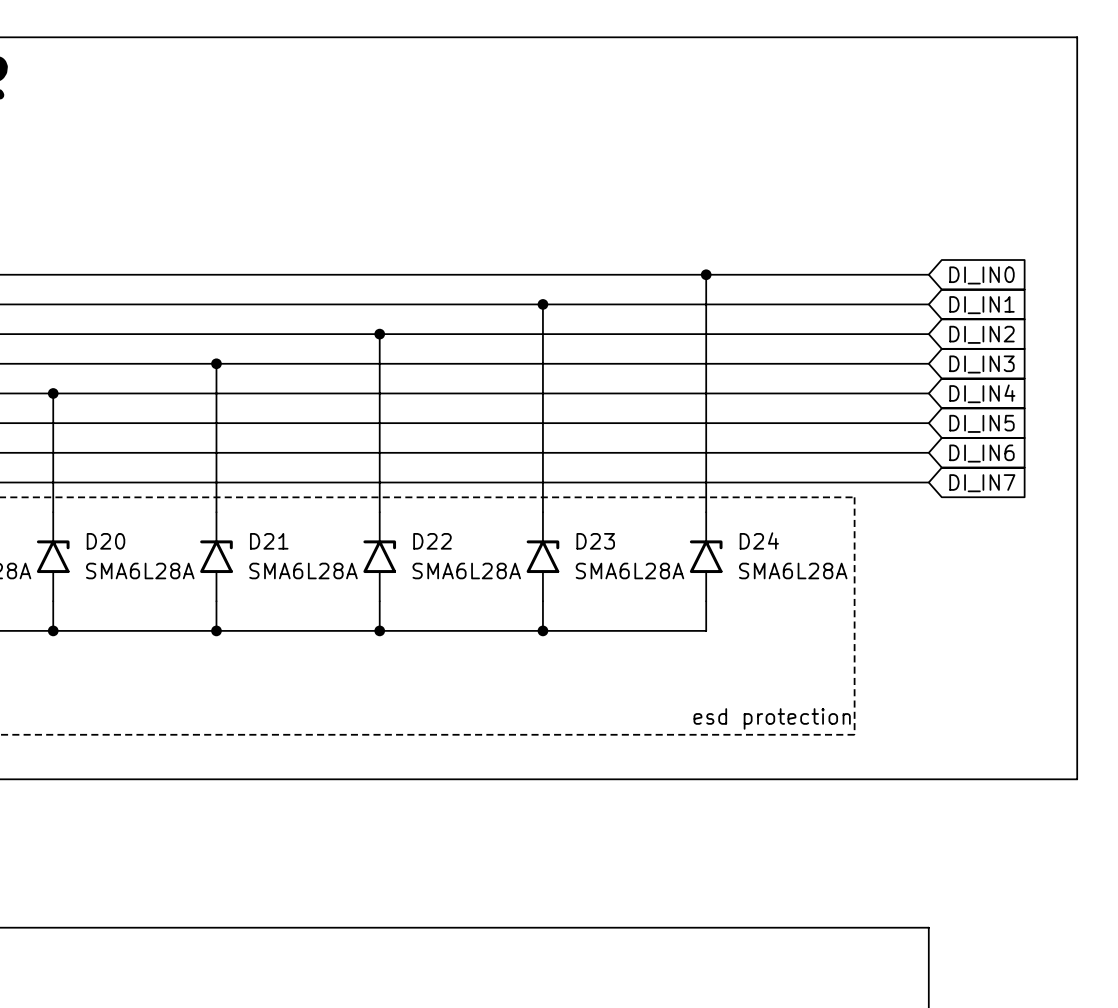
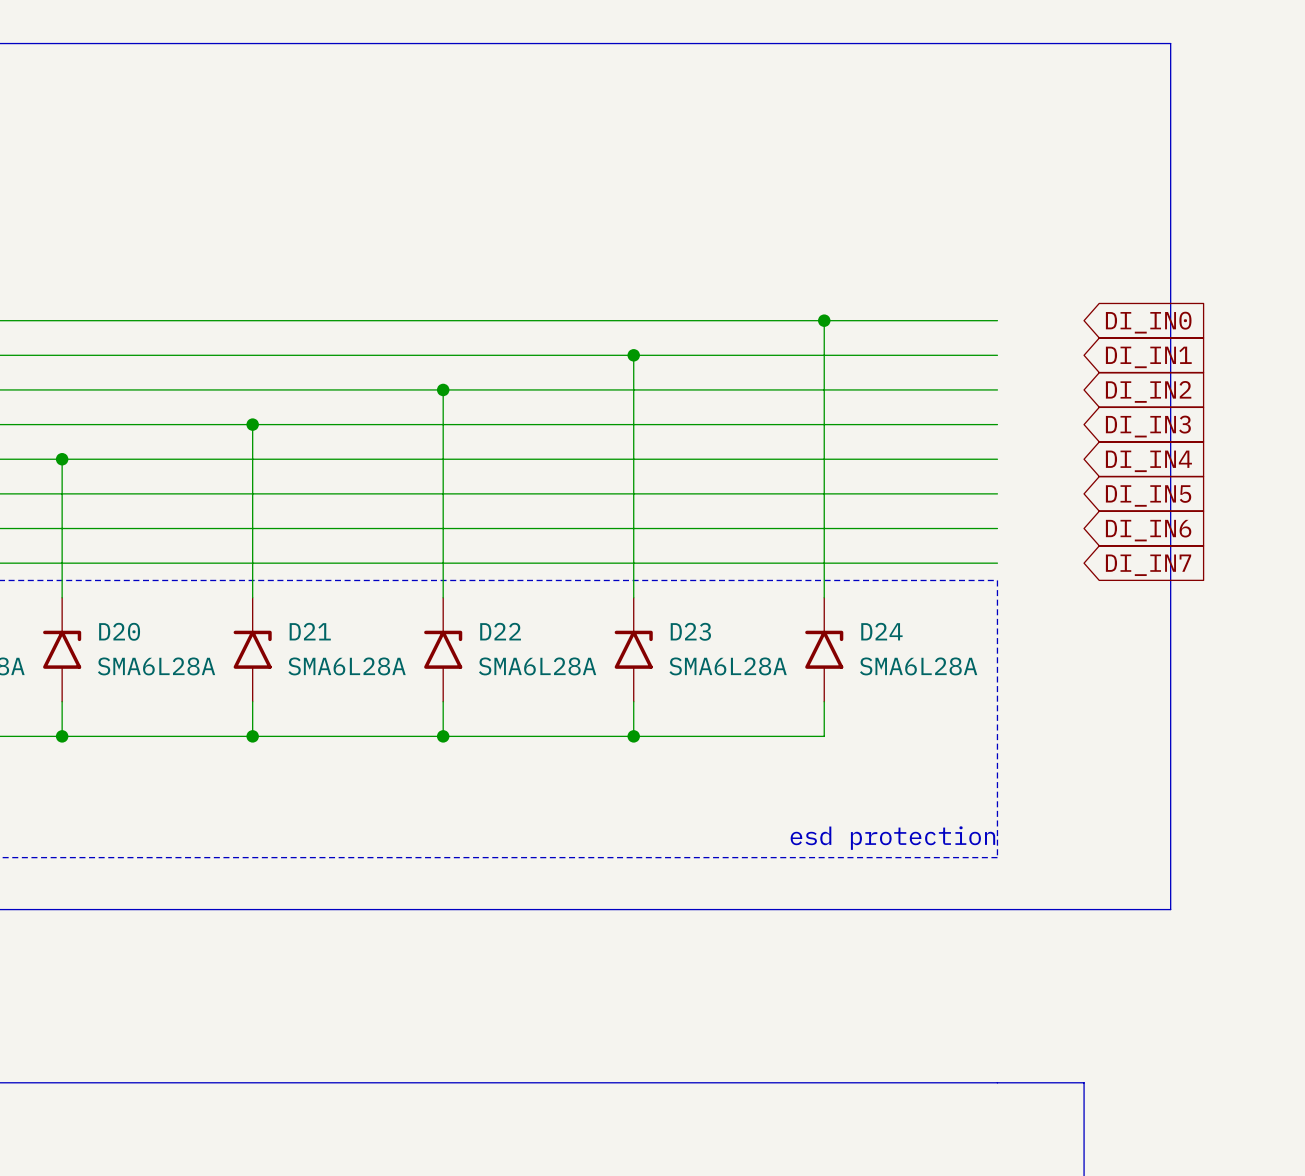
line: (1003, 37) (1077, 37) (1077, 779) (1003, 779) -> (1170, 43) (1170, 909)
wire: (854, 274) (928, 274) -> none
wire: (854, 304) (928, 304) -> none
wire: (854, 334) (928, 334) -> none
wire: (854, 363) (928, 363) -> none
wire: (854, 393) (928, 393) -> none
wire: (854, 423) (928, 423) -> none
wire: (854, 452) (928, 452) -> none
wire: (854, 482) (928, 482) -> none

